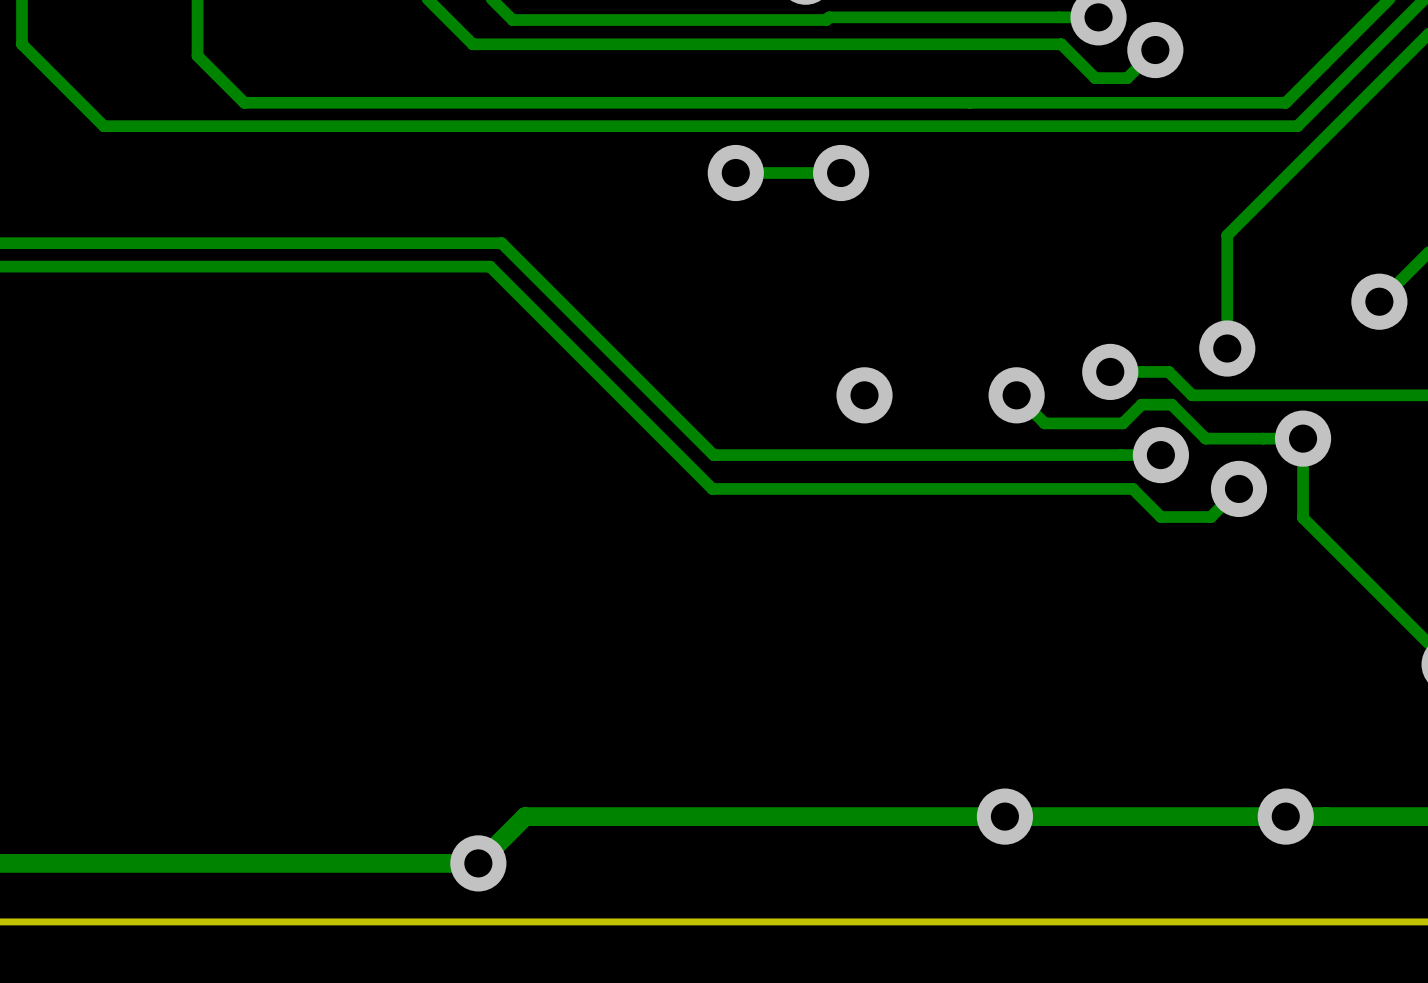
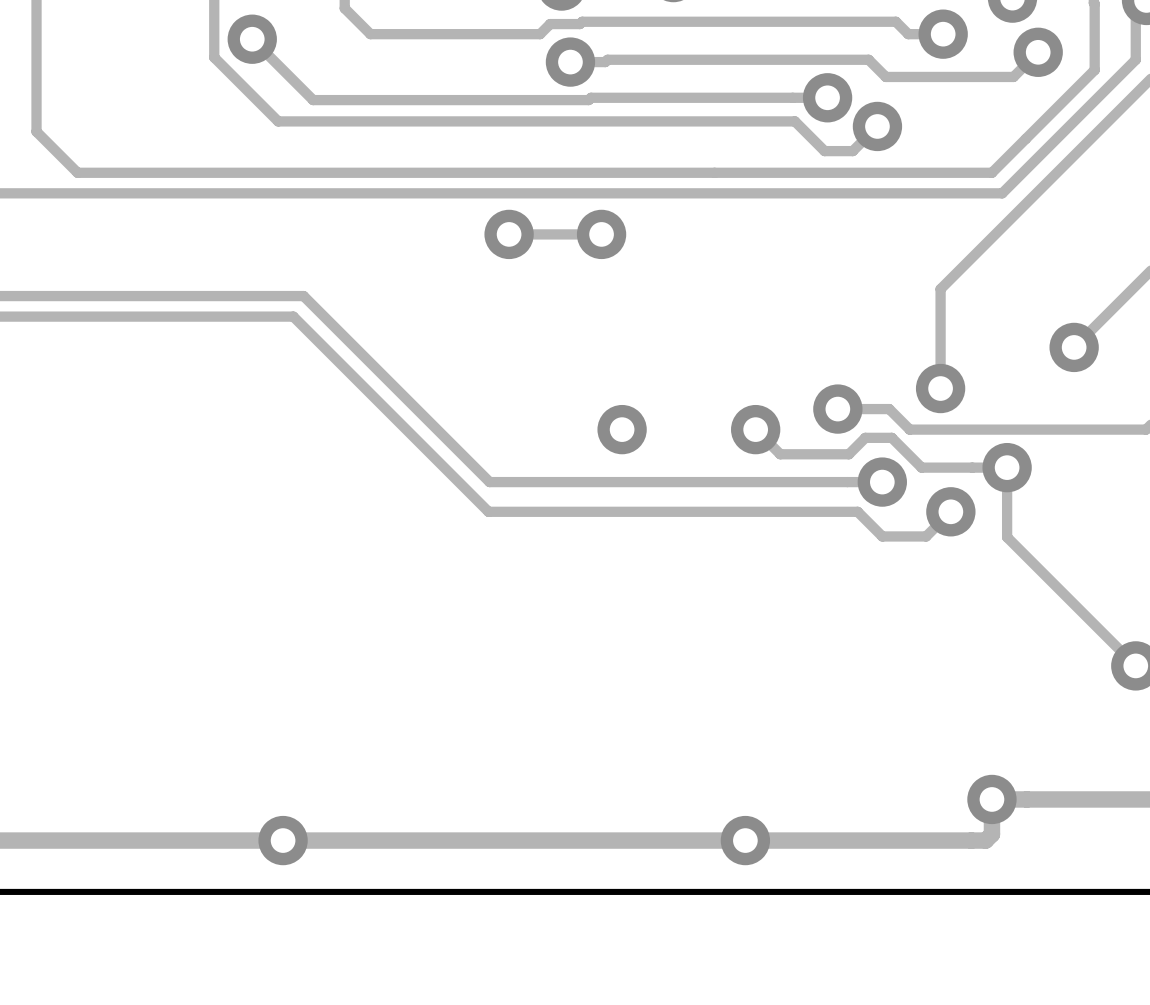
via position: (1004, 816) -> (745, 840)
track: (1285, 816) (525, 816) (478, 863) -> (991, 799) (991, 834) (985, 840) (283, 840)

